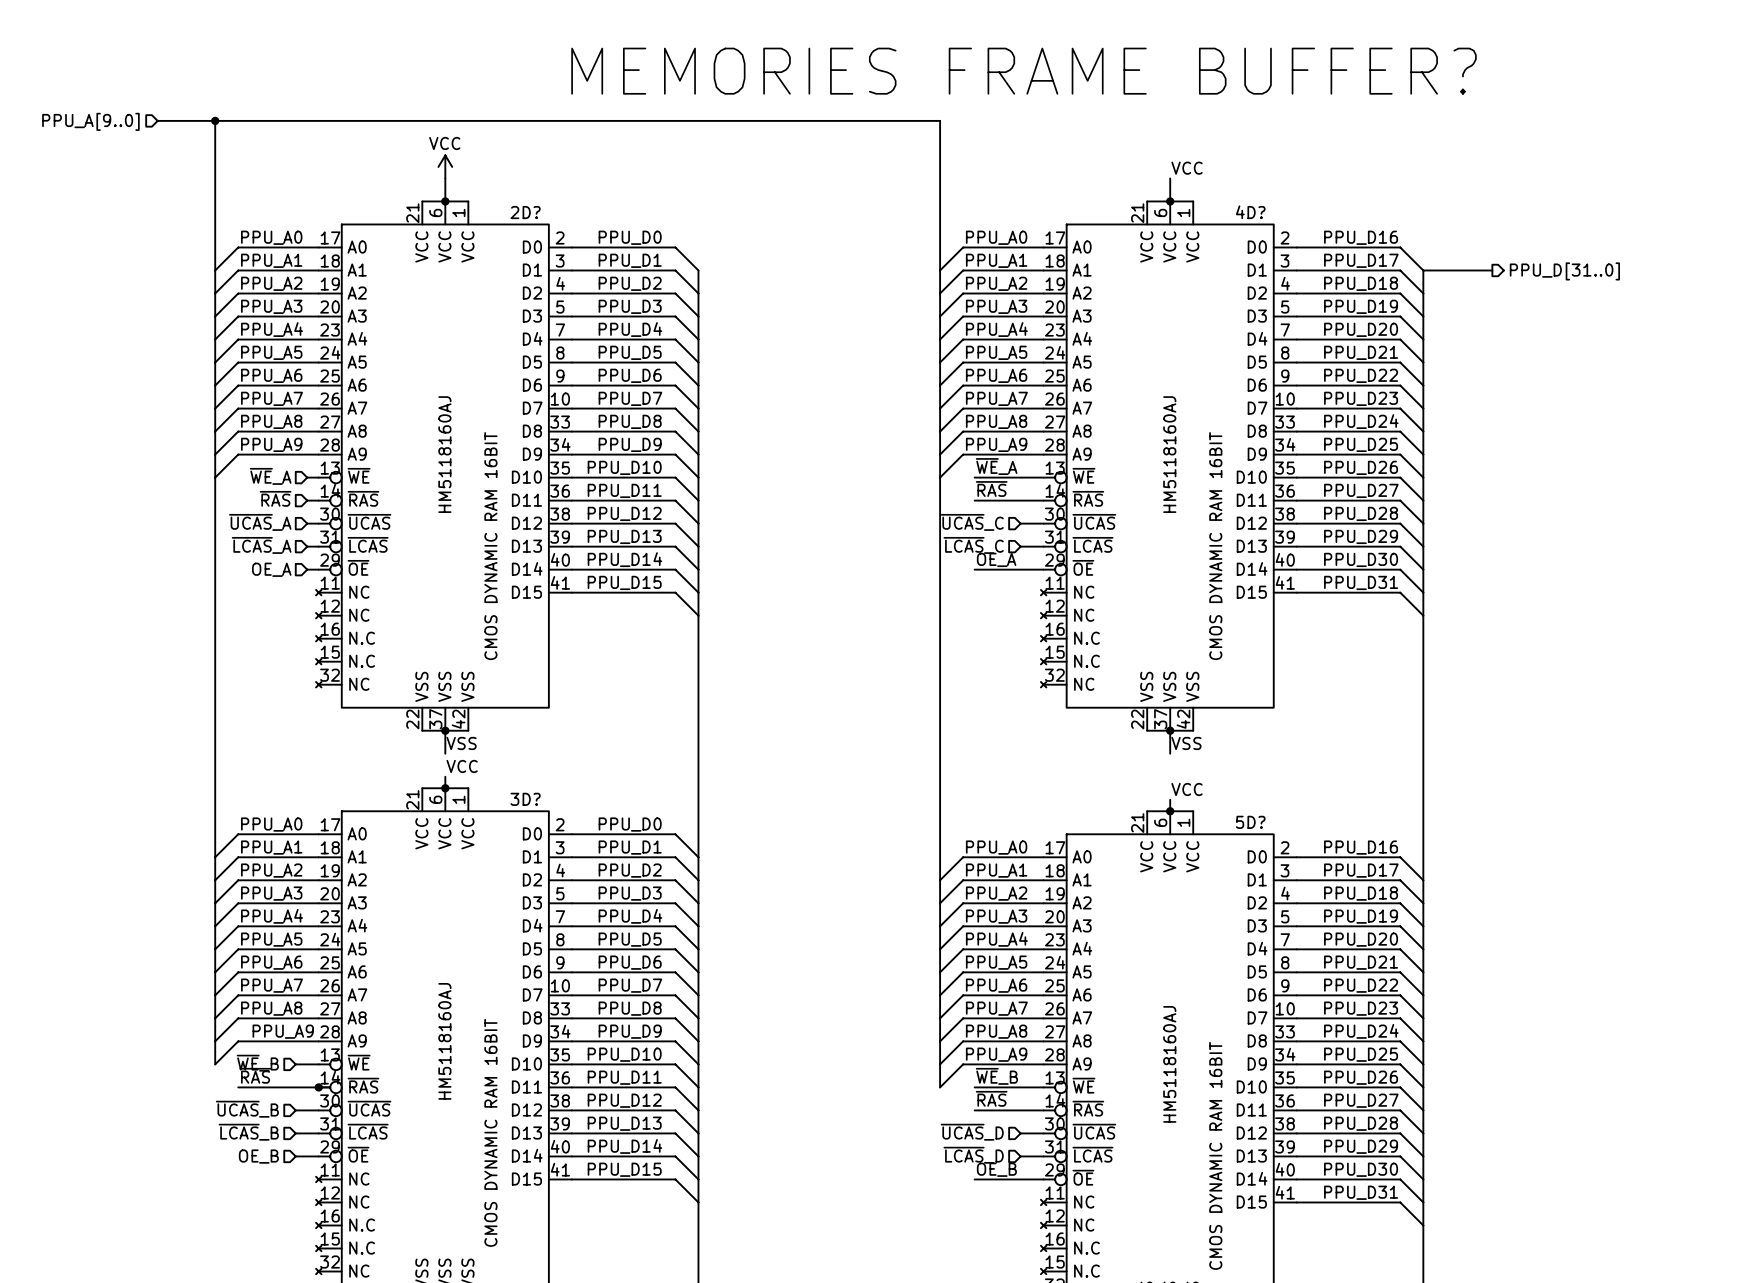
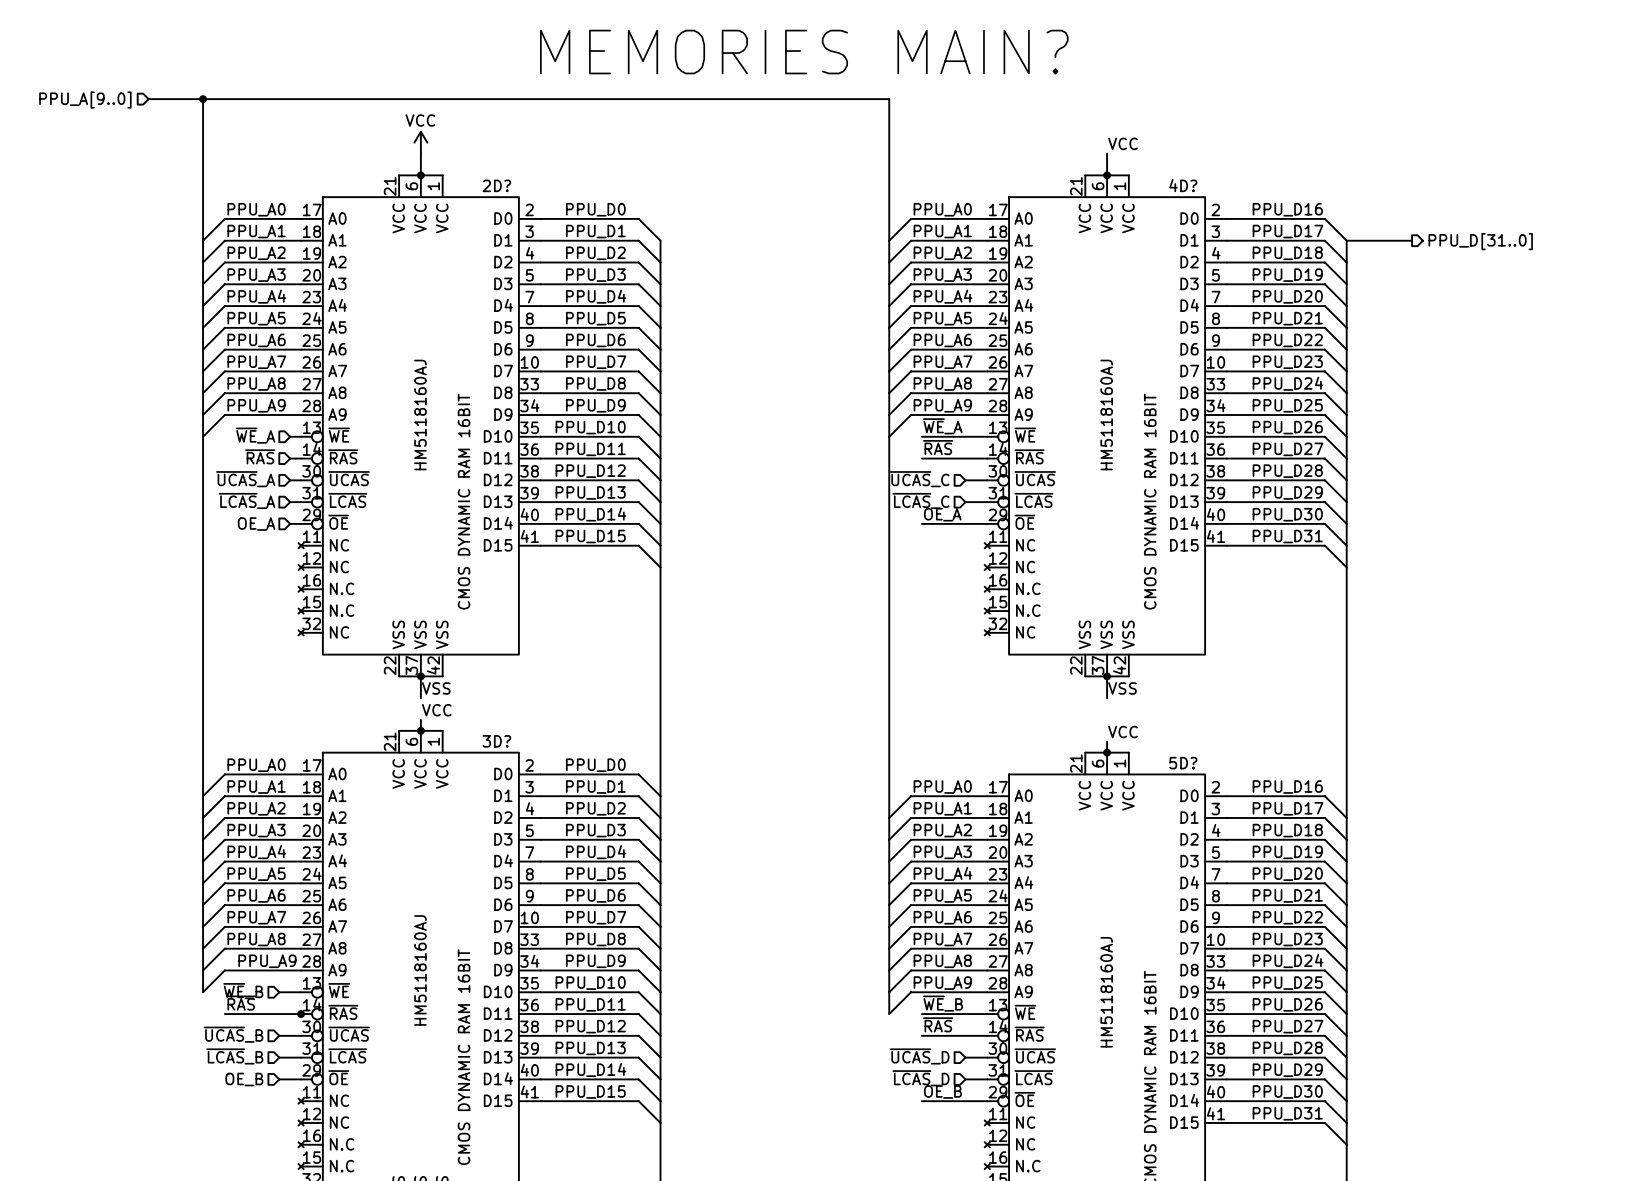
text: MEMORIES FRAME BUFFER? (1023, 71) -> MEMORIES MAIN? (804, 52)

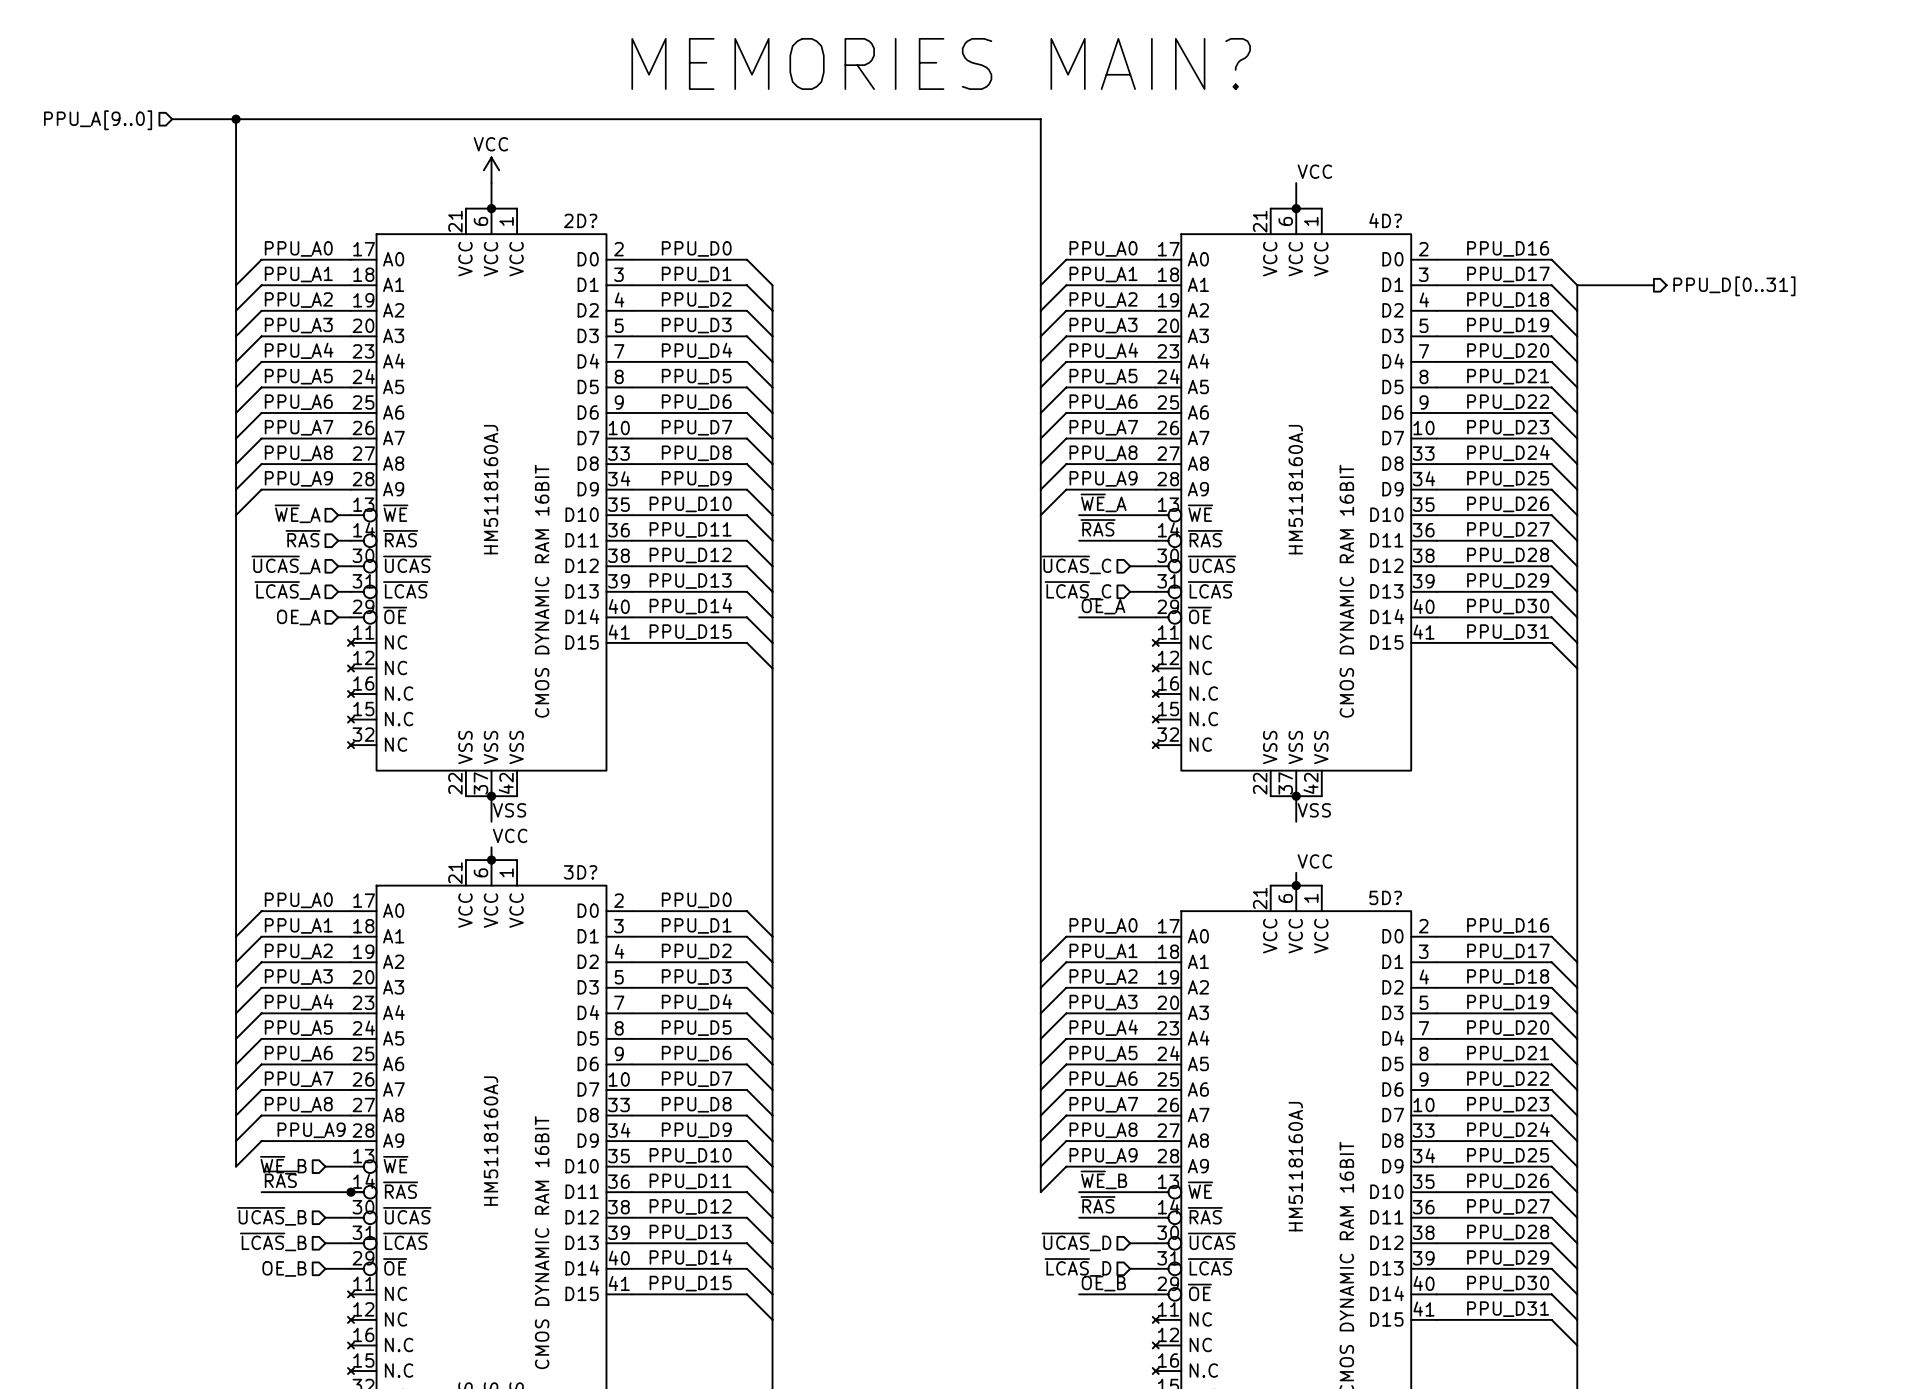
hierarchical label: PPU_D[31..0] (1480, 241) -> PPU_D[0..31] (1734, 286)

